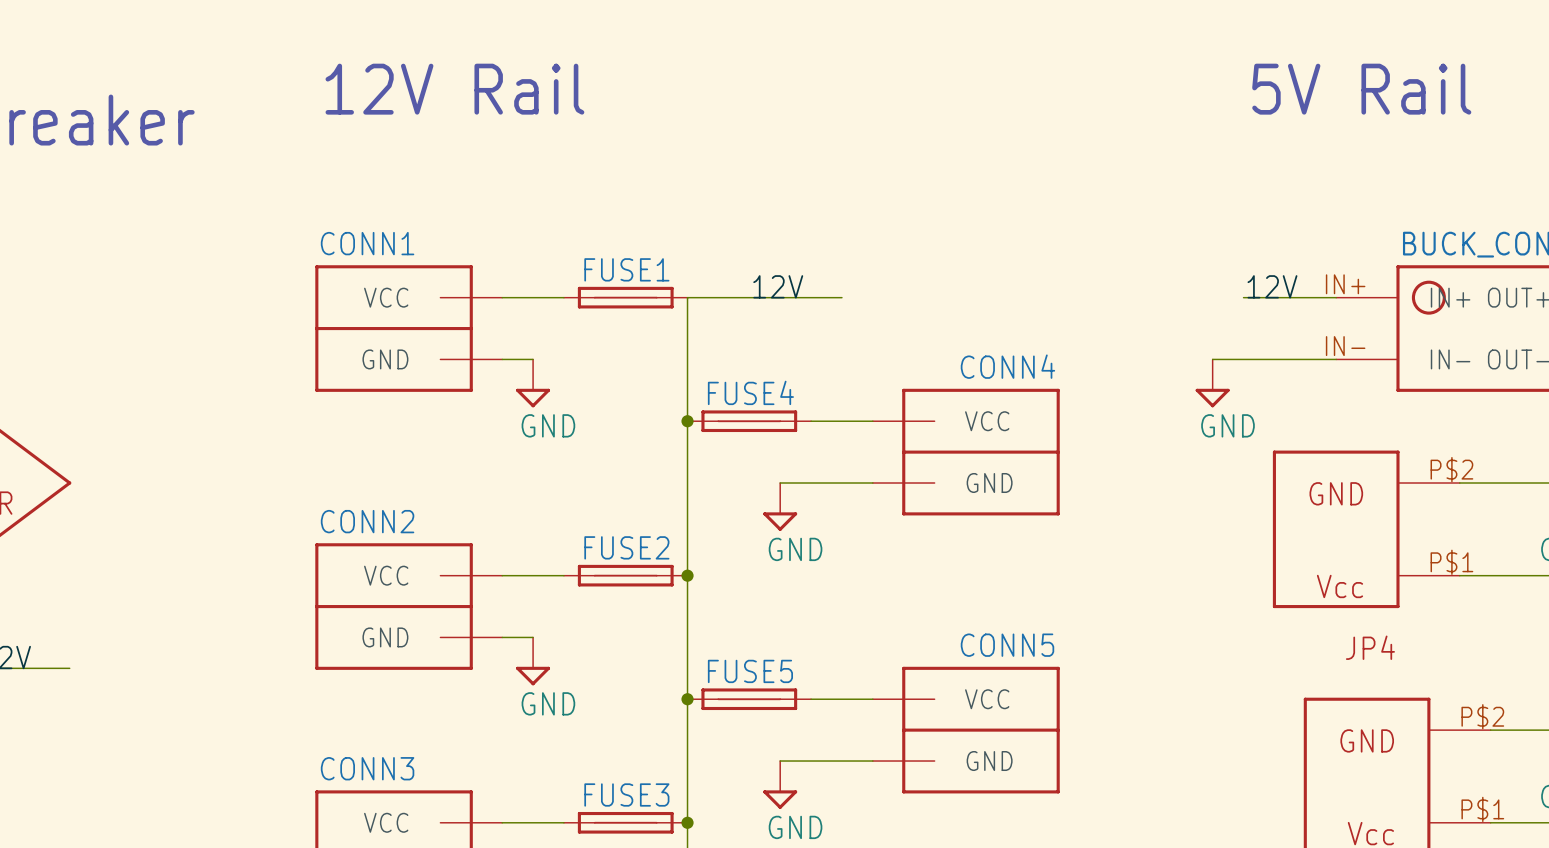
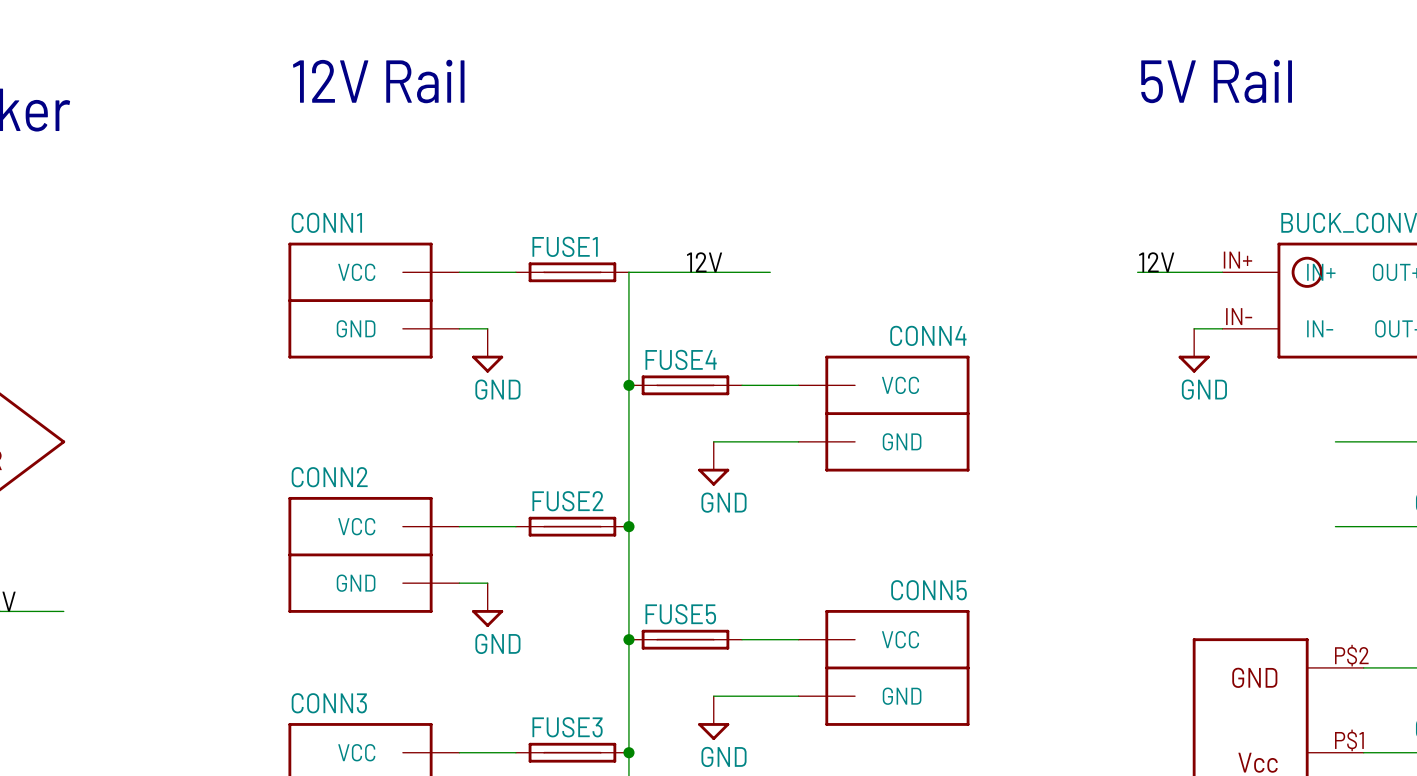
wire: (1212, 359) (1305, 359) -> none
power symbol position: GND (1212, 383) -> GND (1194, 350)
JP4: (1366, 529) -> none

